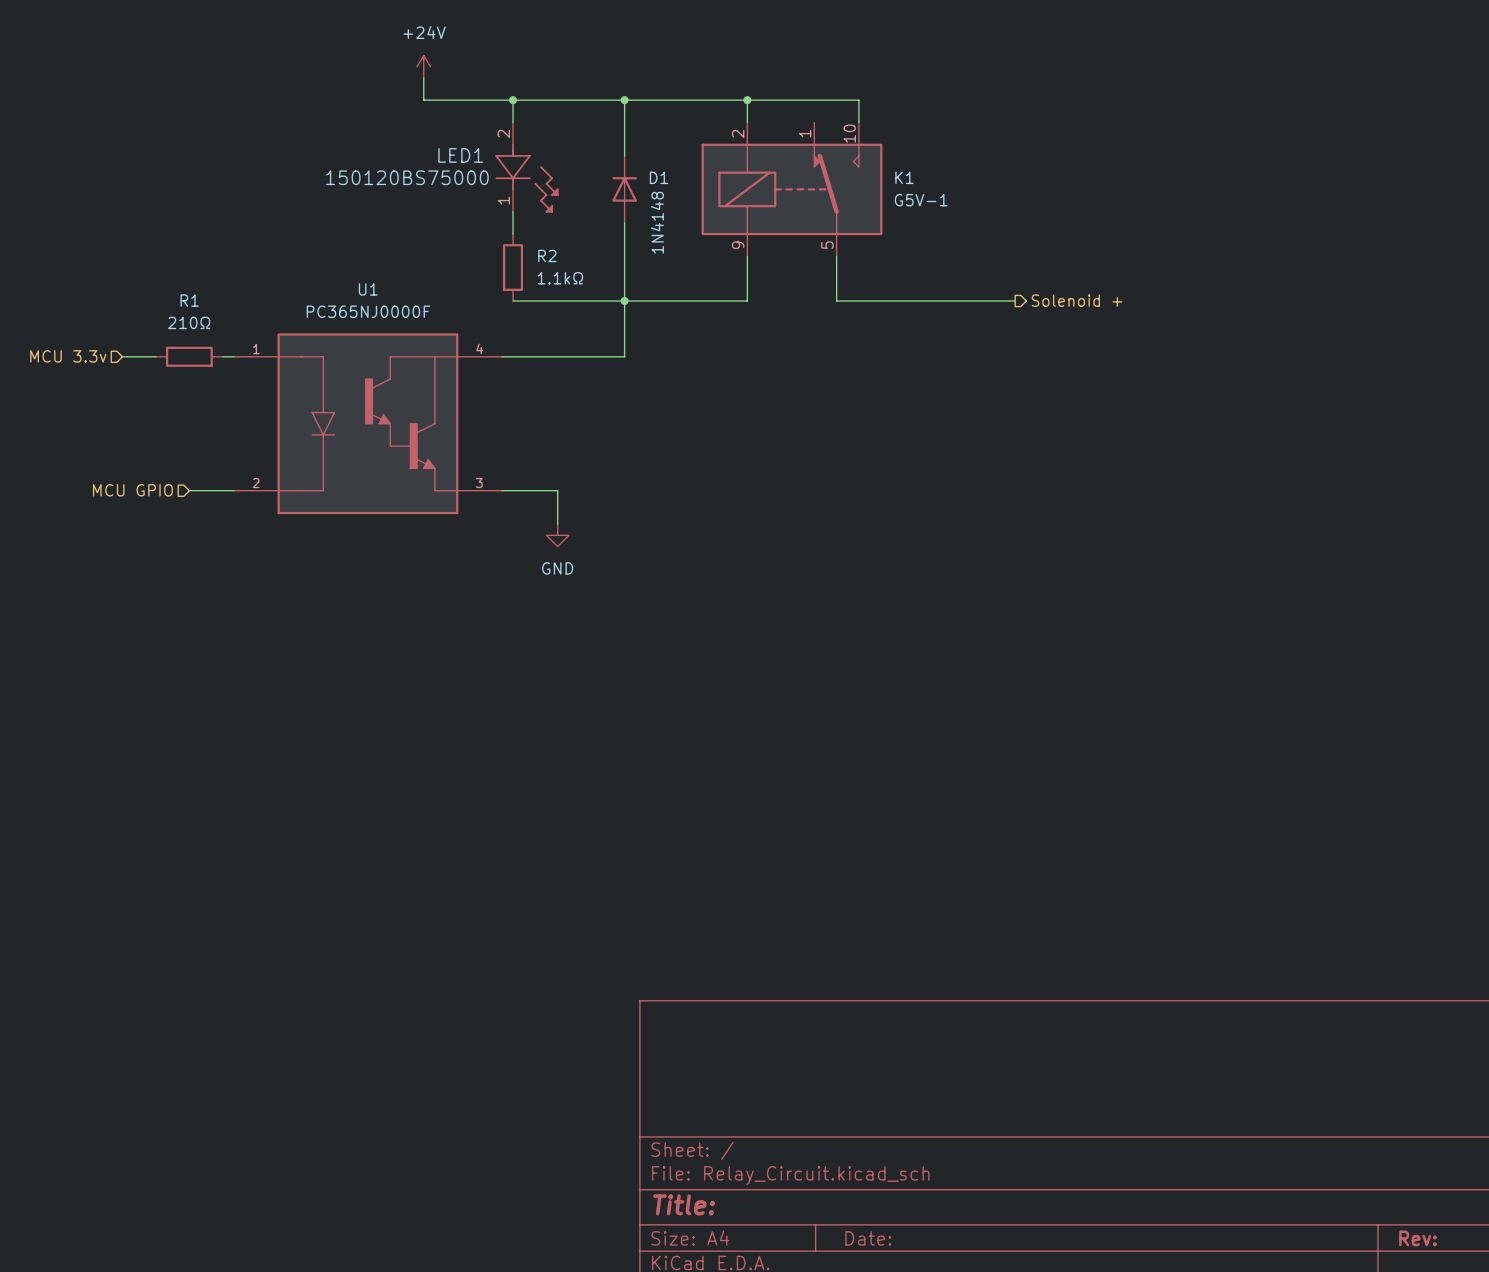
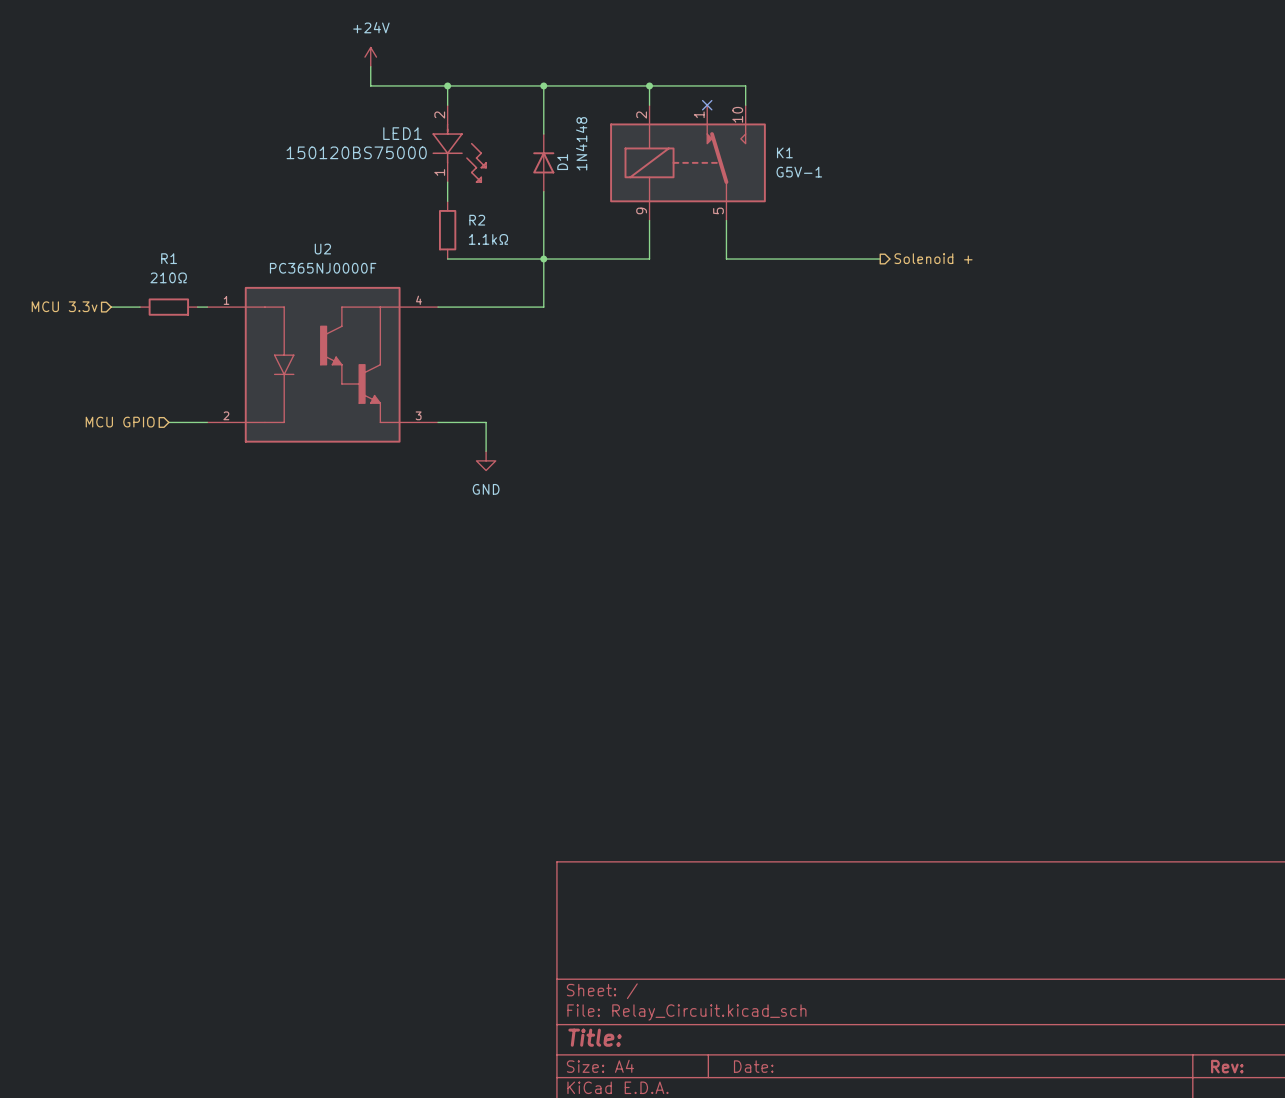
no-connect mark: none -> (707, 105)
D1 name rotation: 0° (658, 177) -> 90° counterclockwise (562, 162)
D1 value position: 1N4148 (657, 222) -> 1N4148 (581, 143)
U1 name: U1 (368, 289) -> U2 (322, 249)

